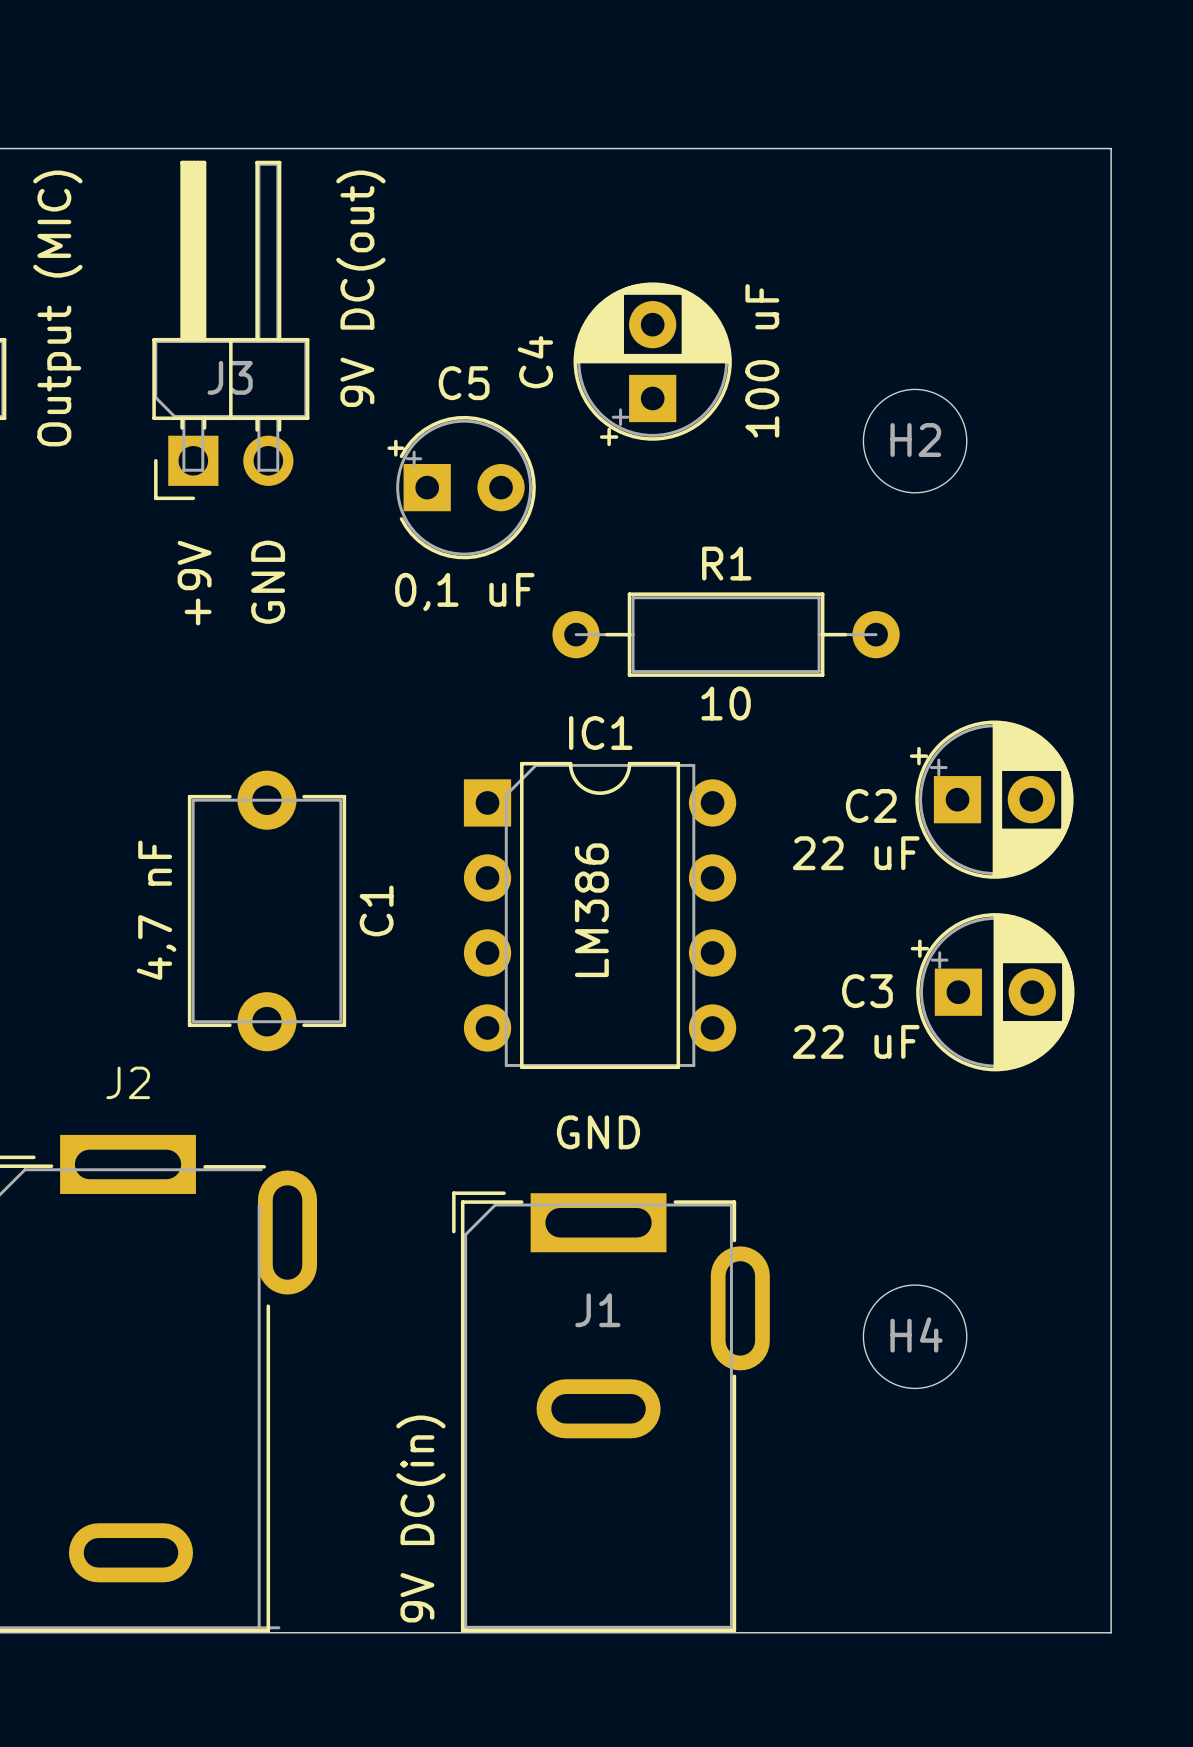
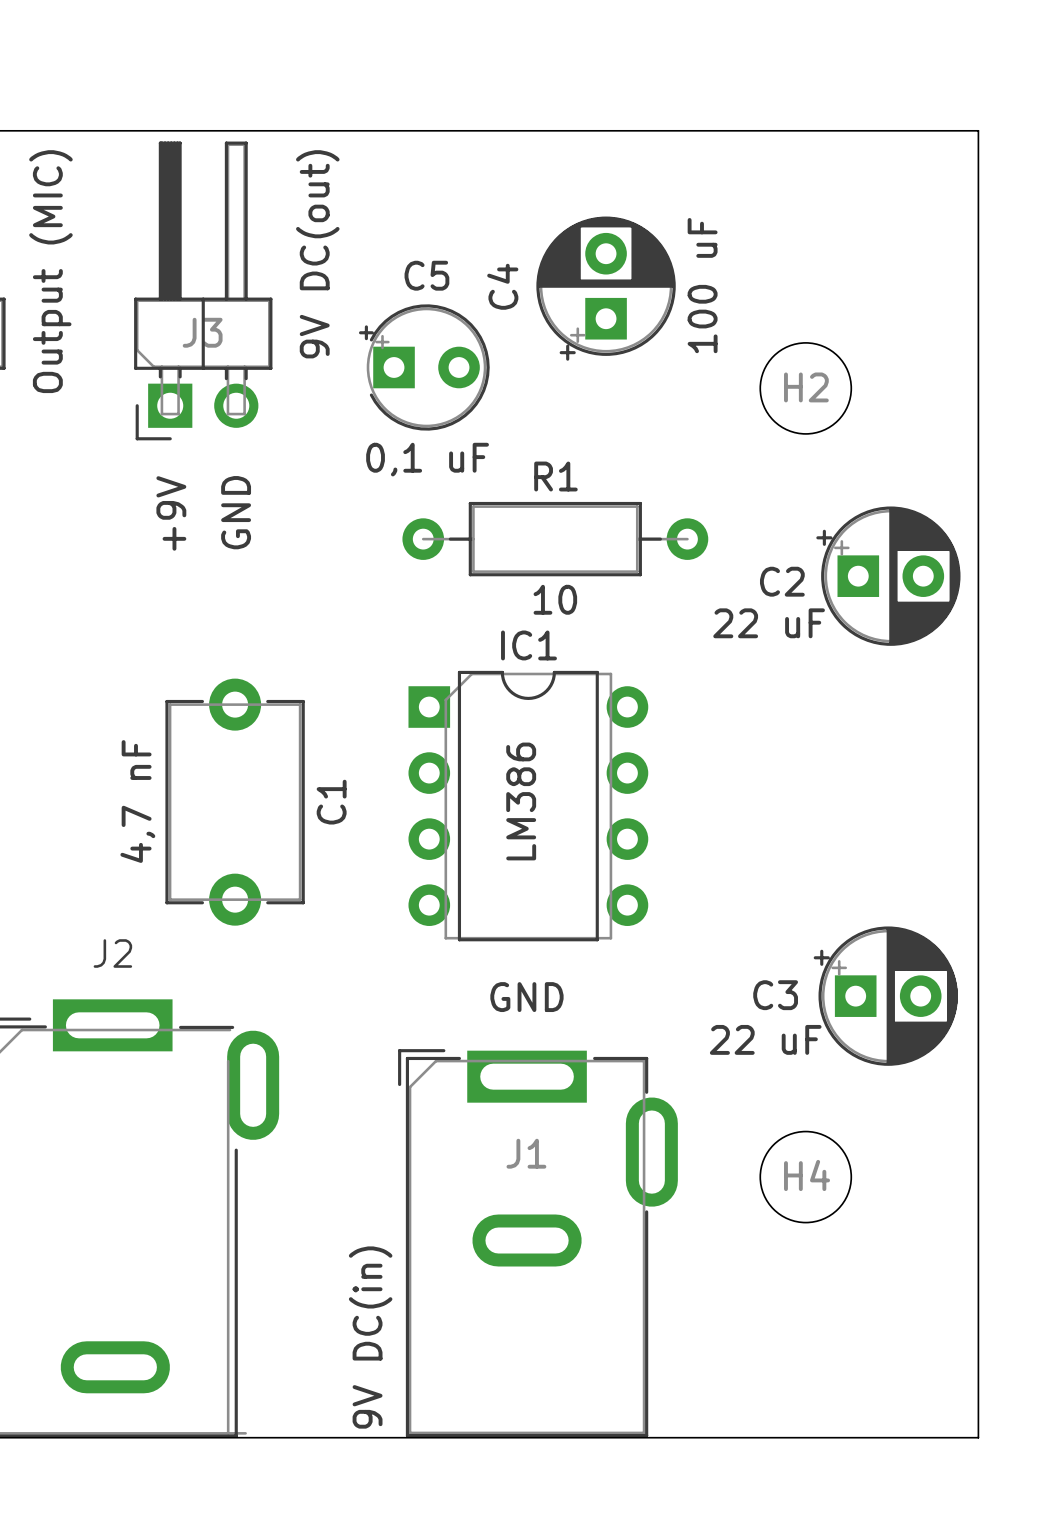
C4 position: (652, 364) -> (606, 288)
C5 position: (461, 487) -> (424, 367)
R1 position: (726, 634) -> (555, 539)
C2 position: (991, 799) -> (888, 576)
C3 position: (992, 992) -> (885, 996)

